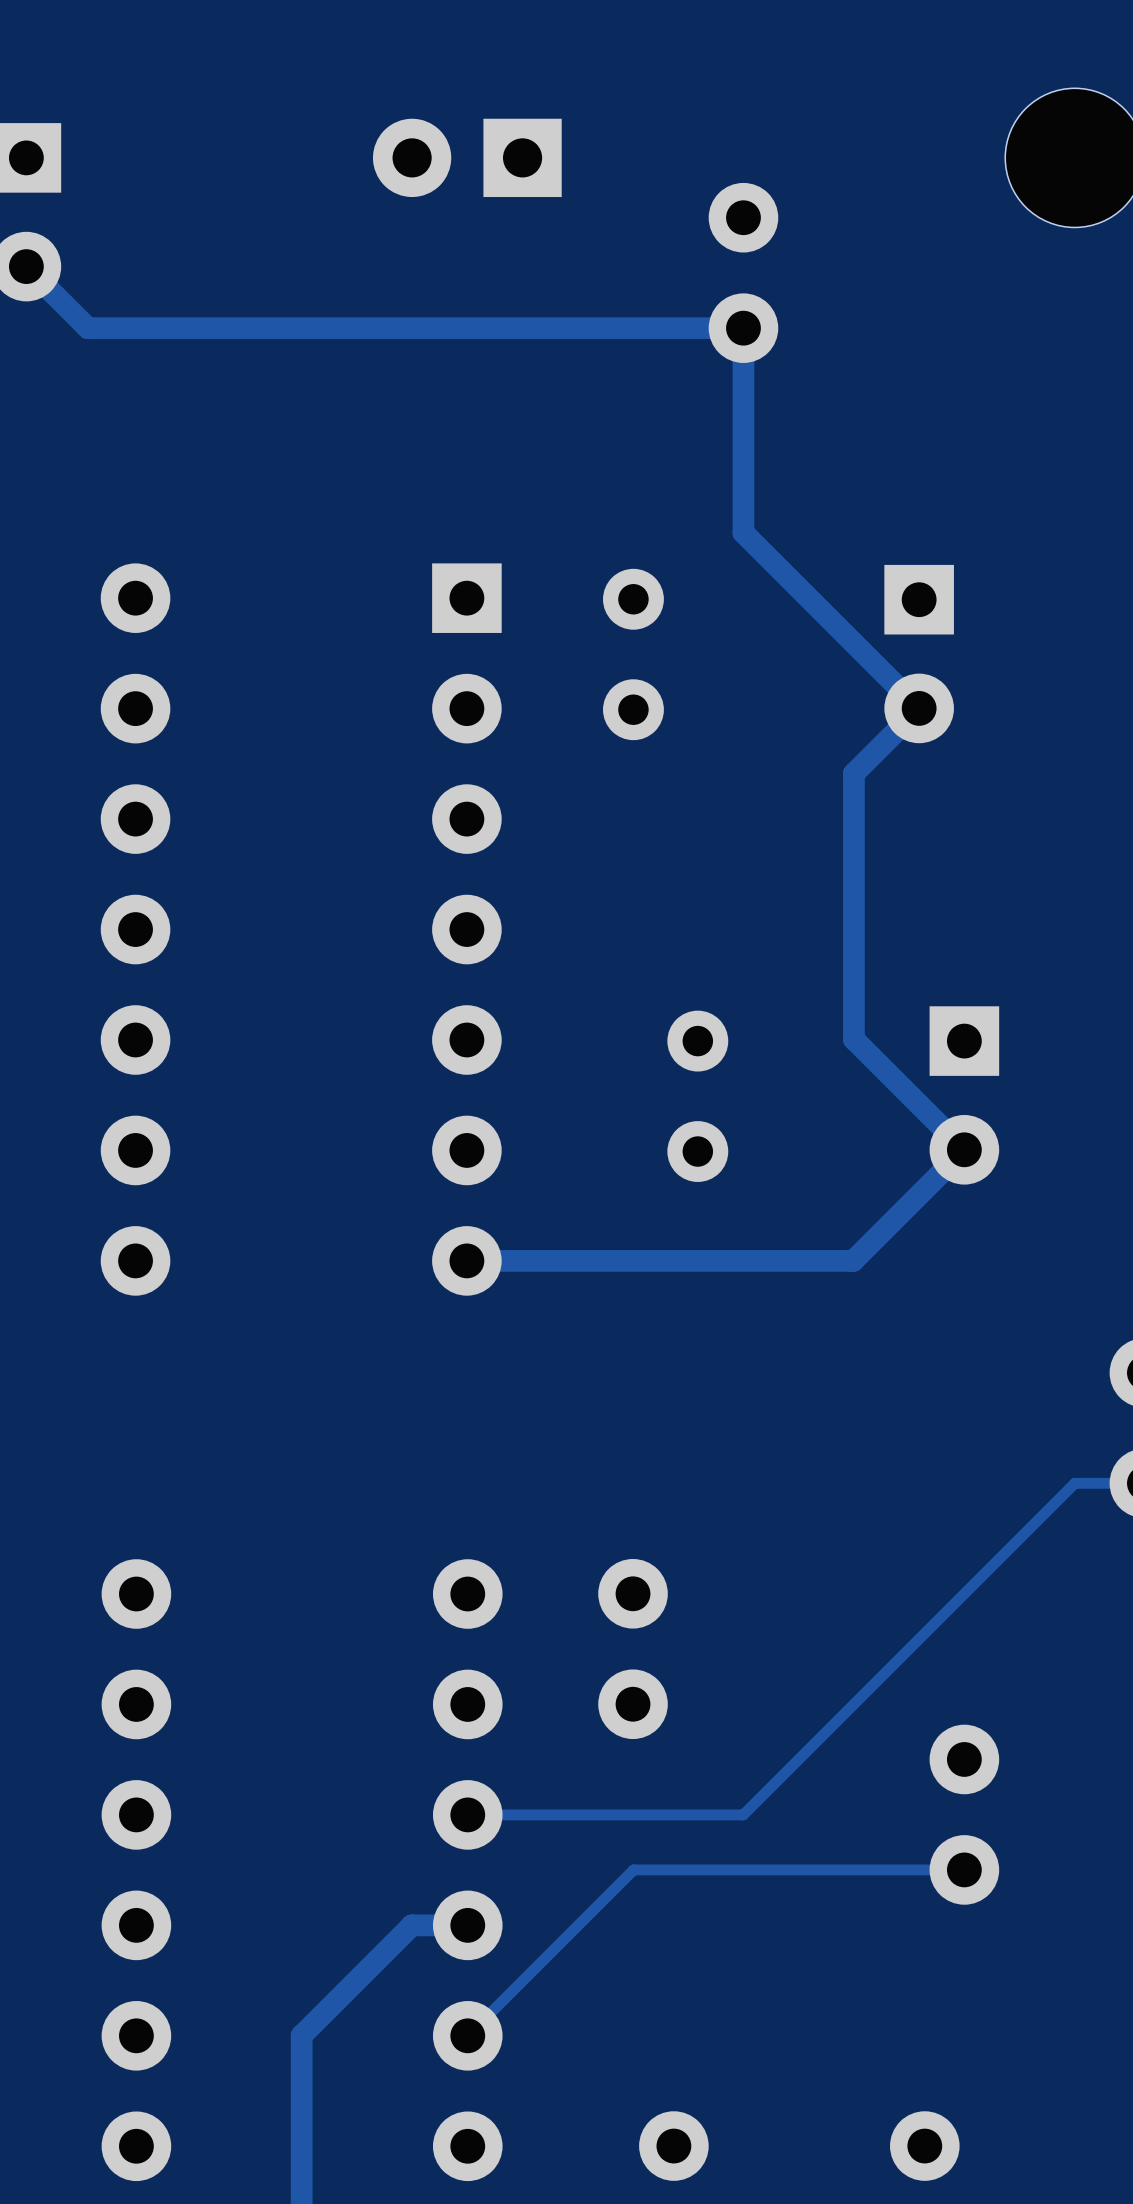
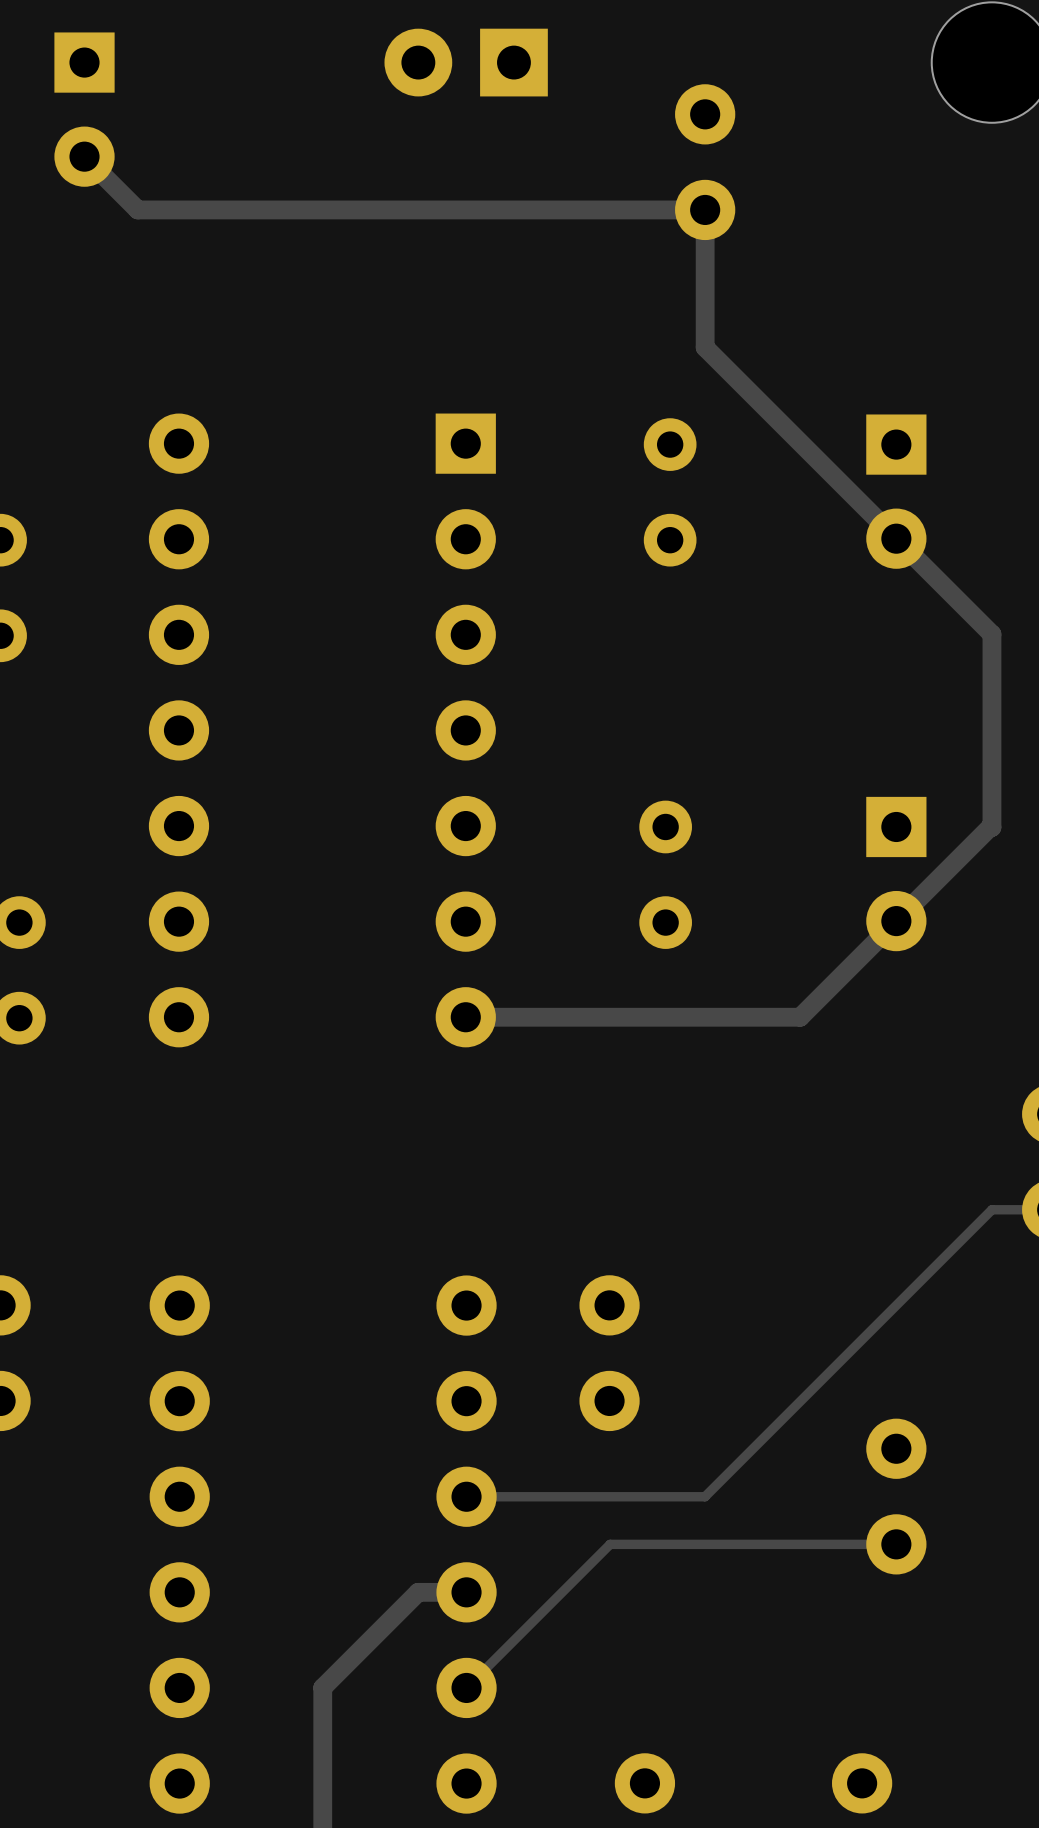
track: (743, 487) (743, 532) (919, 708) (853, 773) (853, 1039) (964, 1149) -> (705, 347) (991, 634) (991, 827) (896, 921)
part position: (633, 654) -> (670, 492)
part position: (919, 654) -> (896, 491)

